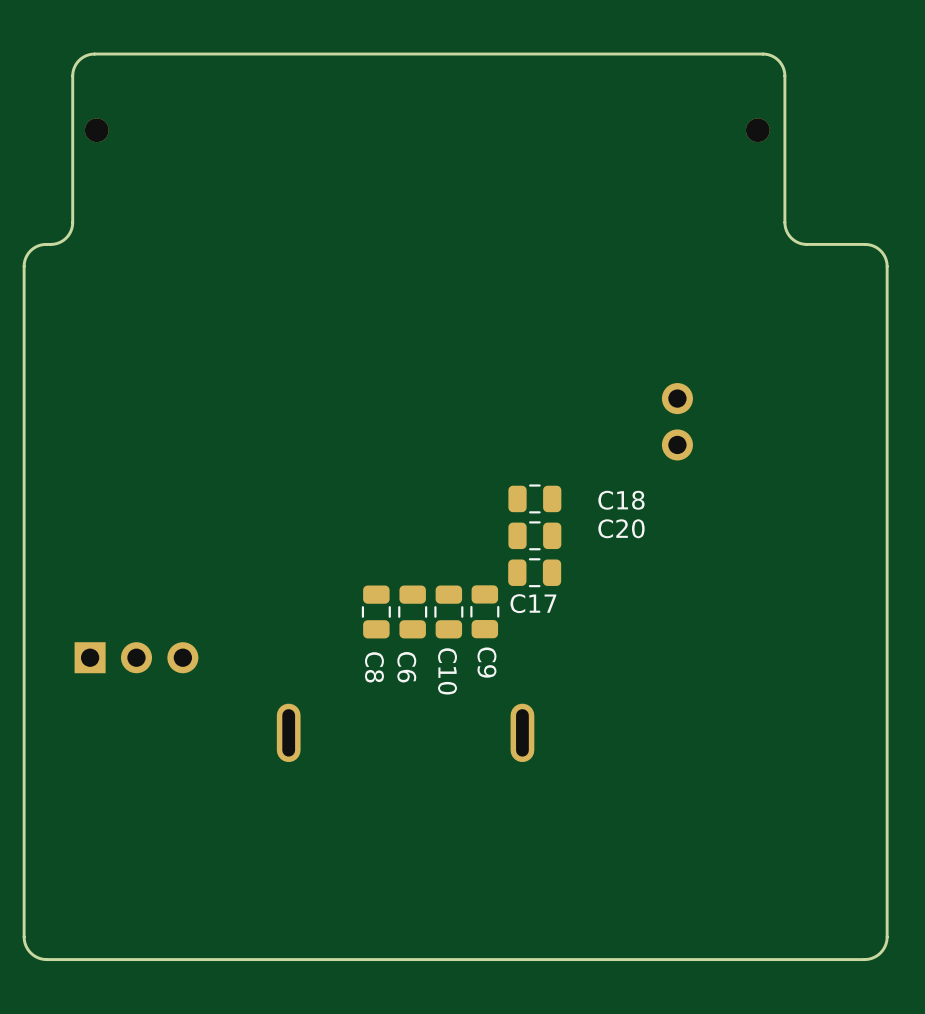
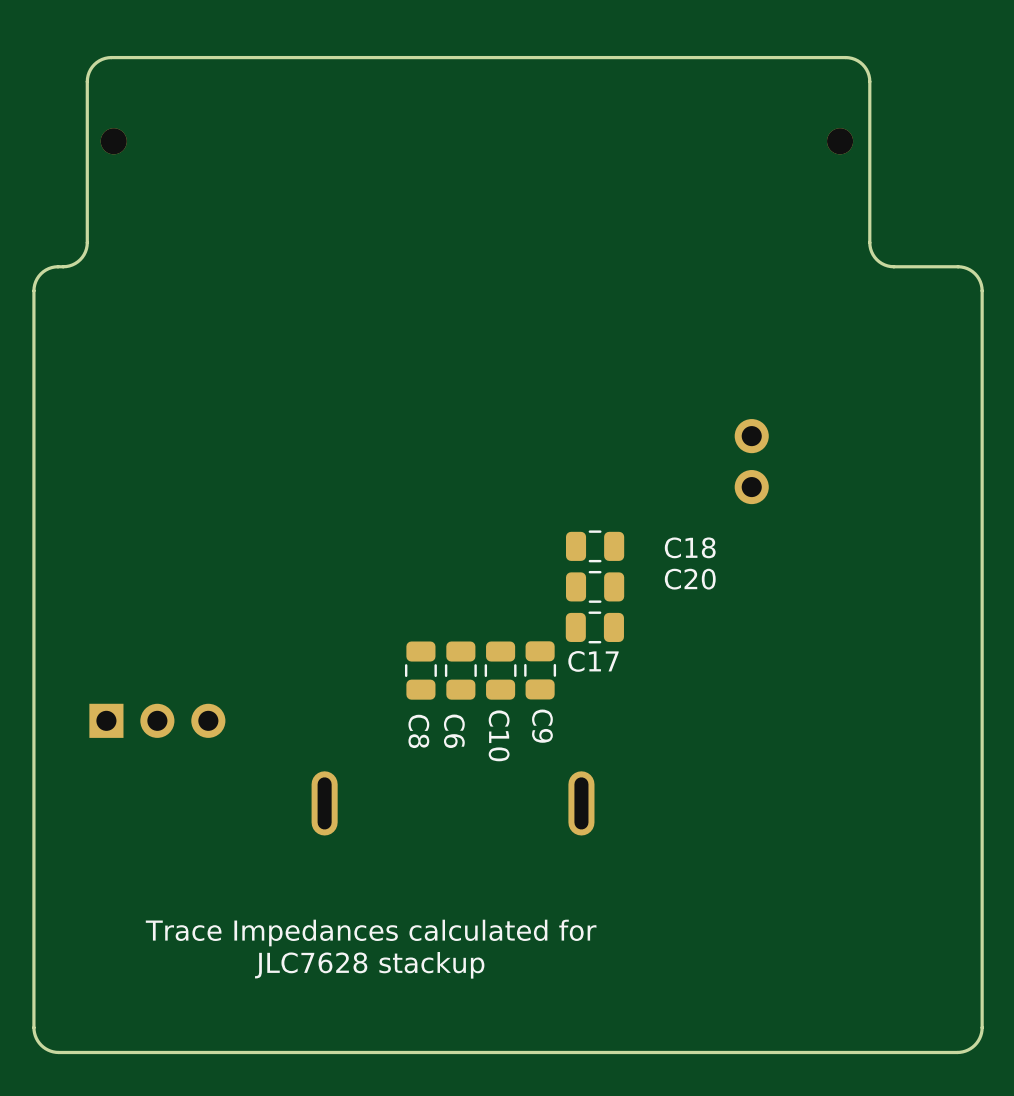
text: none -> Trace Impedances calculated for (371, 933)
text: none -> JLC7628 stackup (369, 965)

